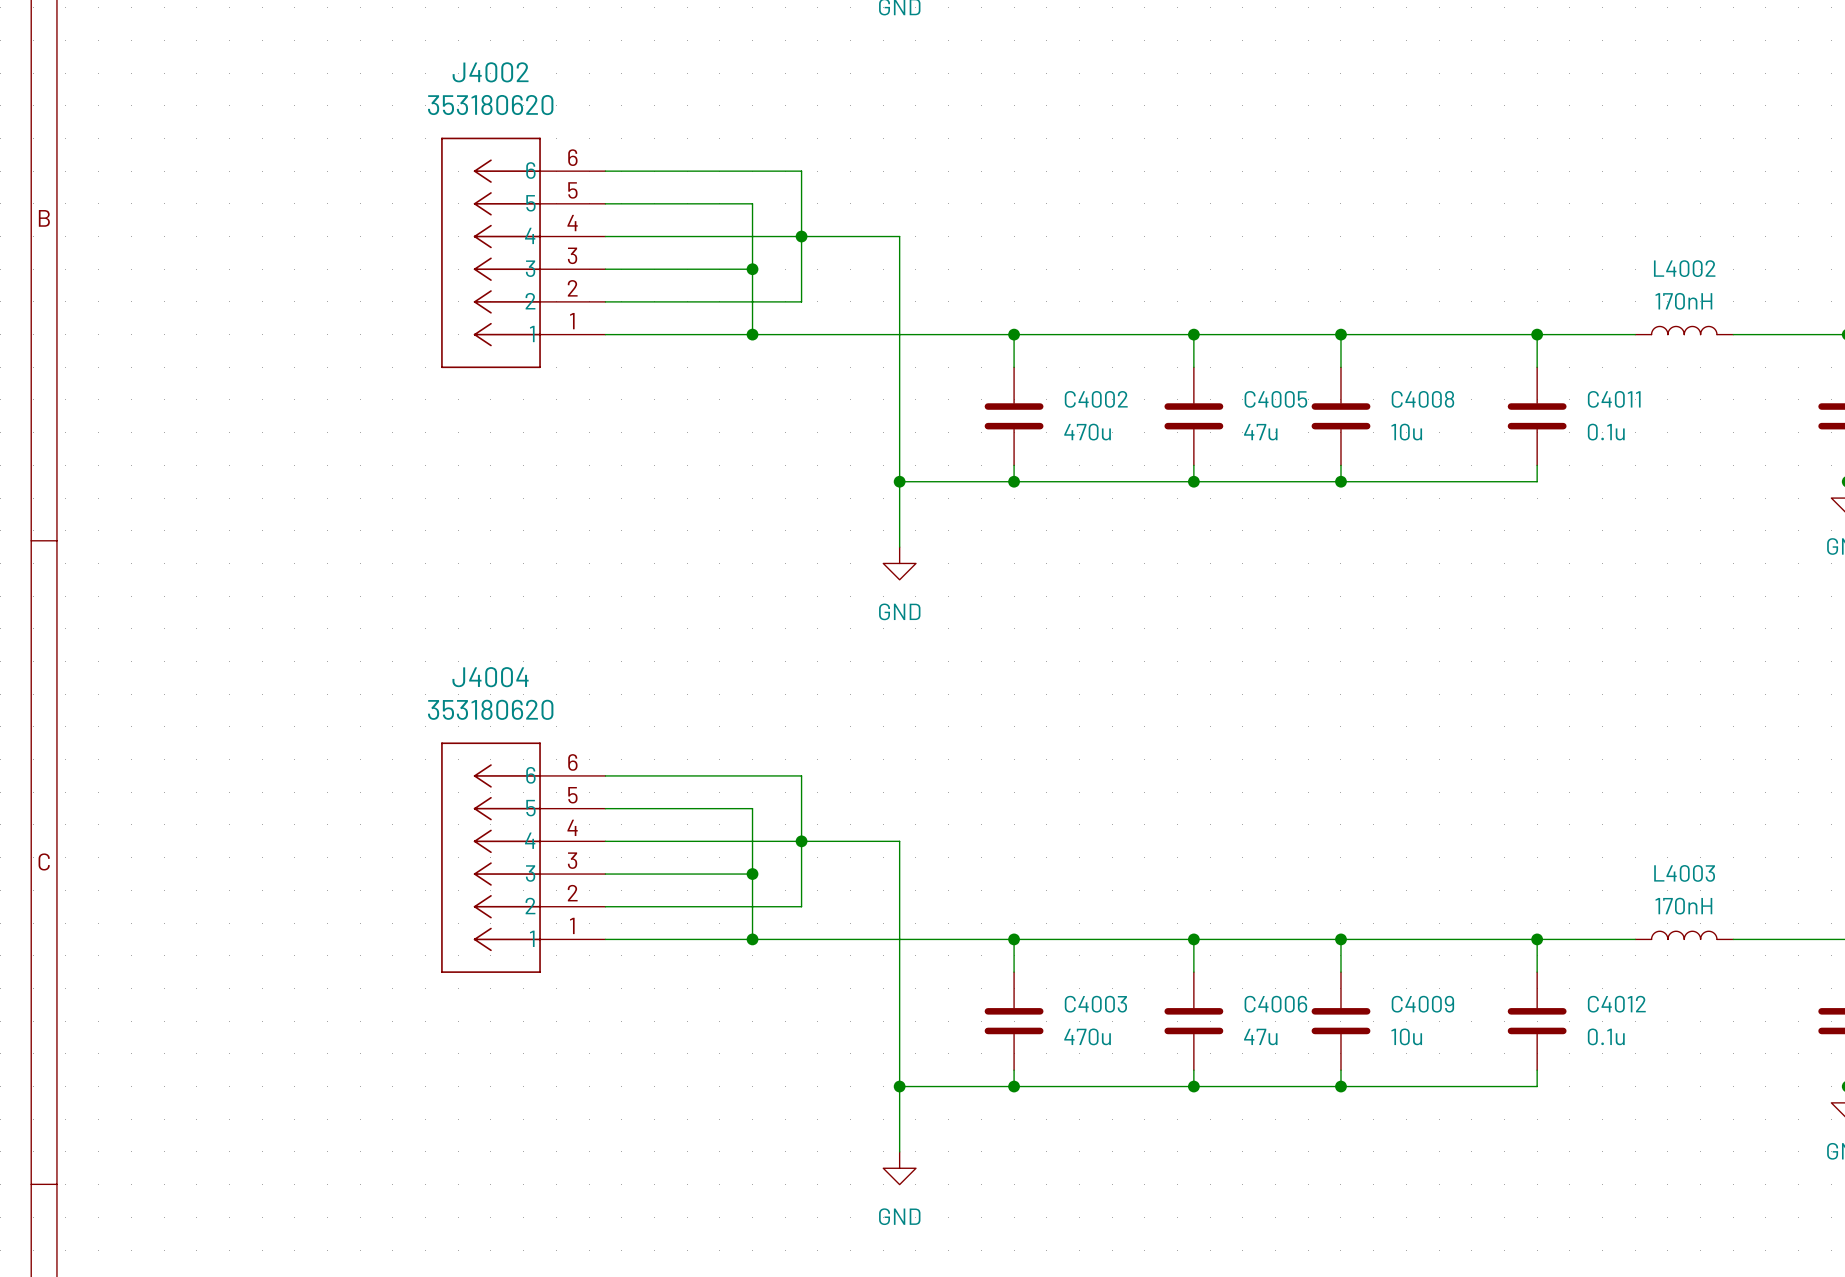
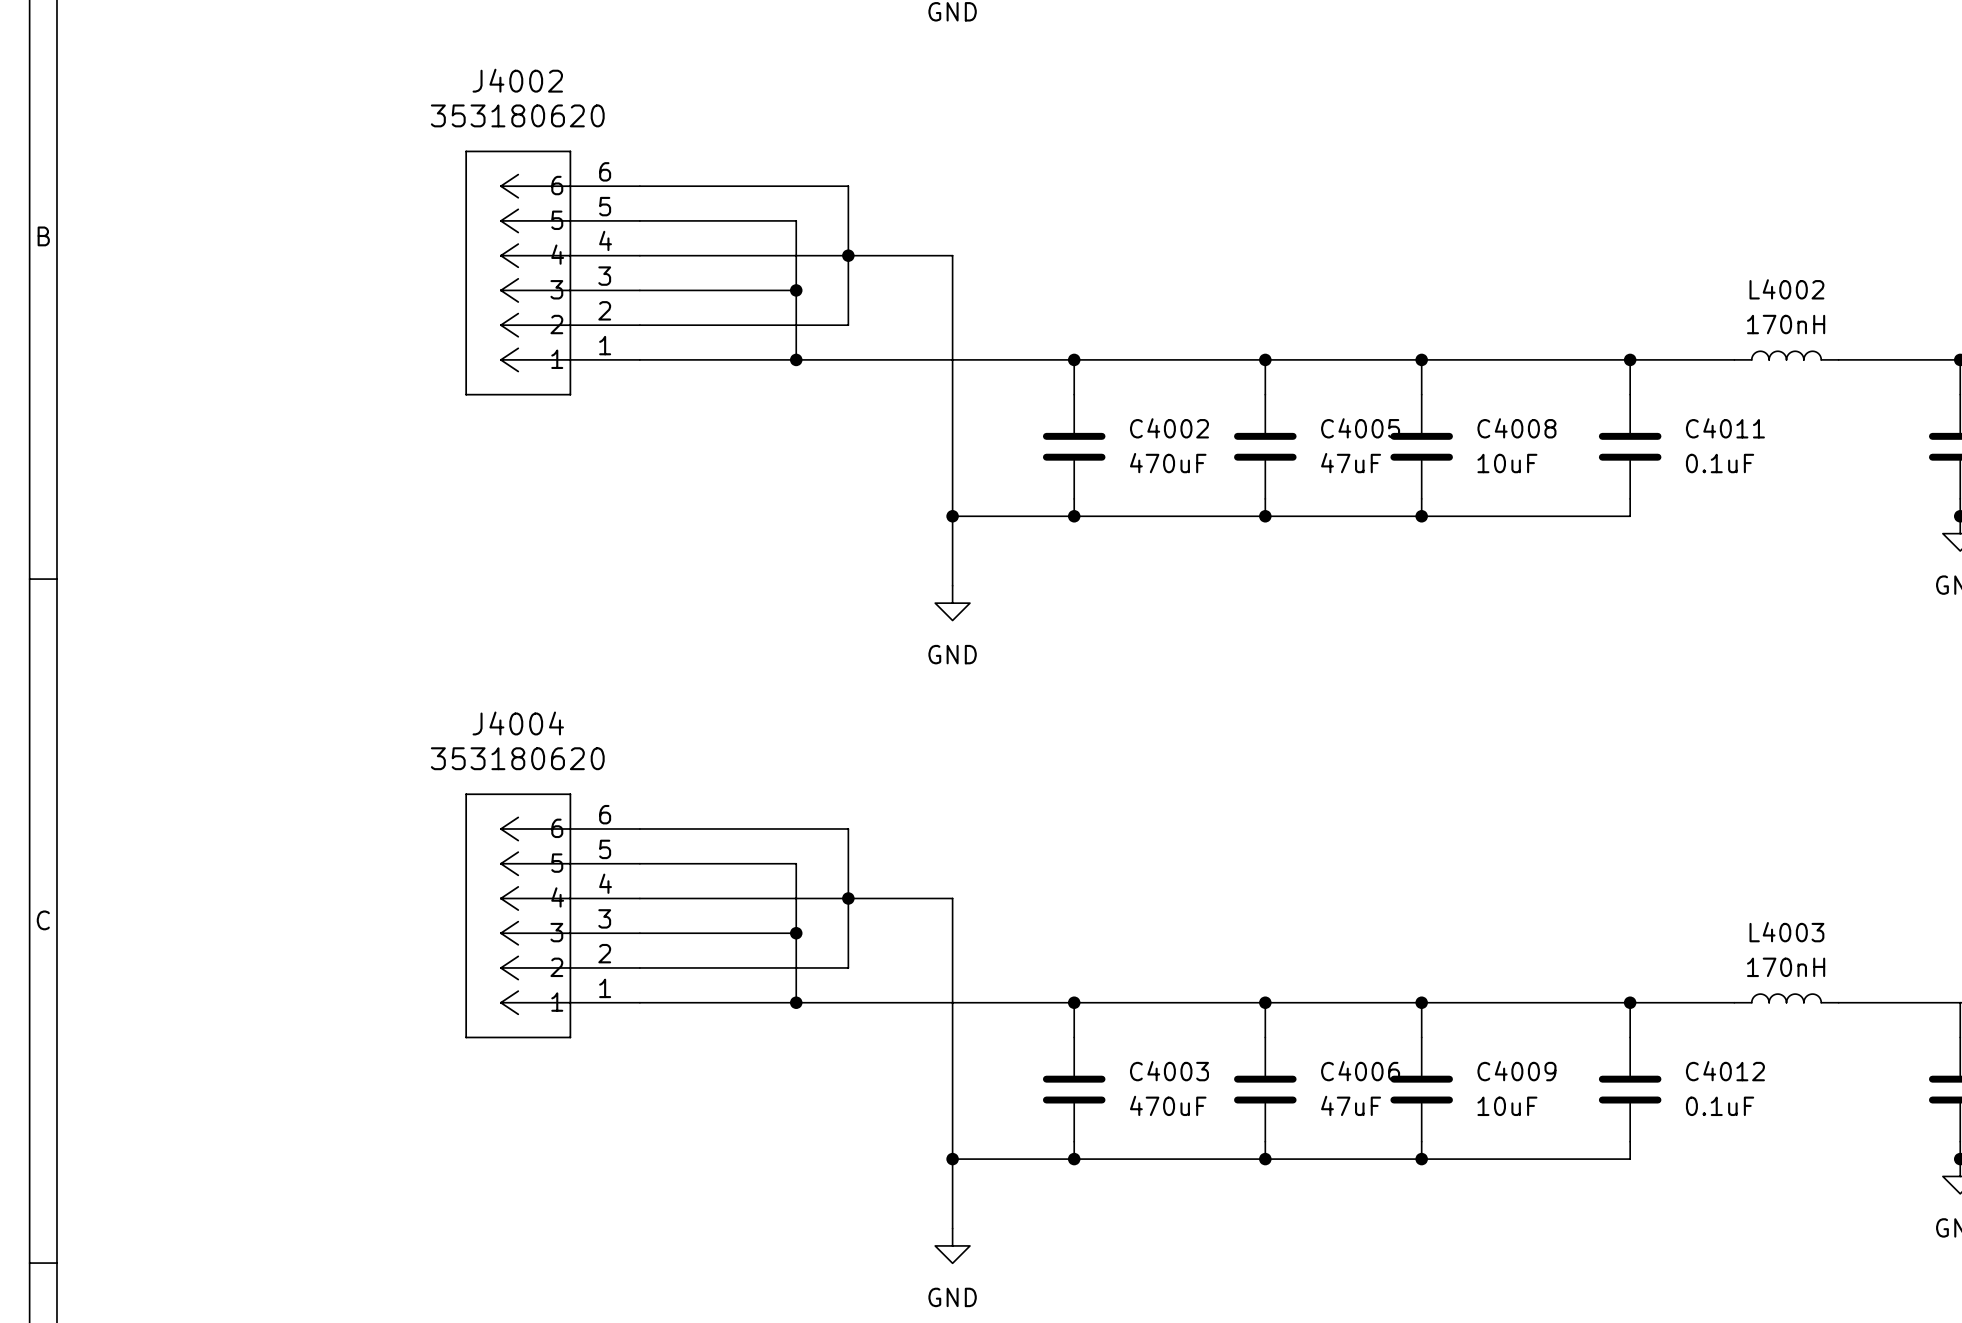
C4002 value: 470u (1087, 432) -> 470uF (1168, 463)
C4005 value: 47u (1260, 432) -> 47uF (1351, 463)
C4008 value: 10u (1406, 432) -> 10uF (1507, 463)
C4011 value: 0.1u (1606, 432) -> 0.1uF (1720, 463)
C4003 value: 470u (1087, 1036) -> 470uF (1168, 1105)
C4006 value: 47u (1260, 1036) -> 47uF (1351, 1105)
C4009 value: 10u (1406, 1036) -> 10uF (1507, 1106)
C4012 value: 0.1u (1606, 1036) -> 0.1uF (1720, 1106)

